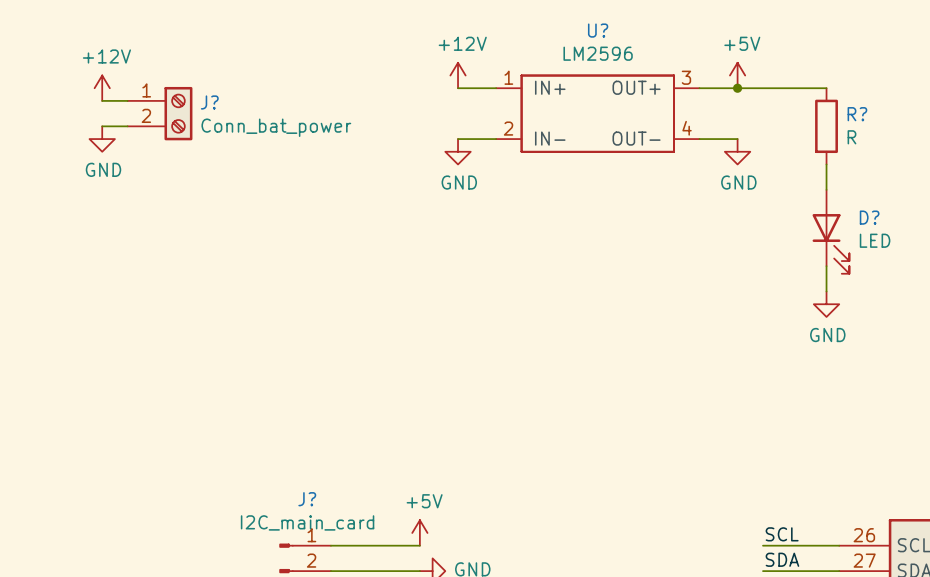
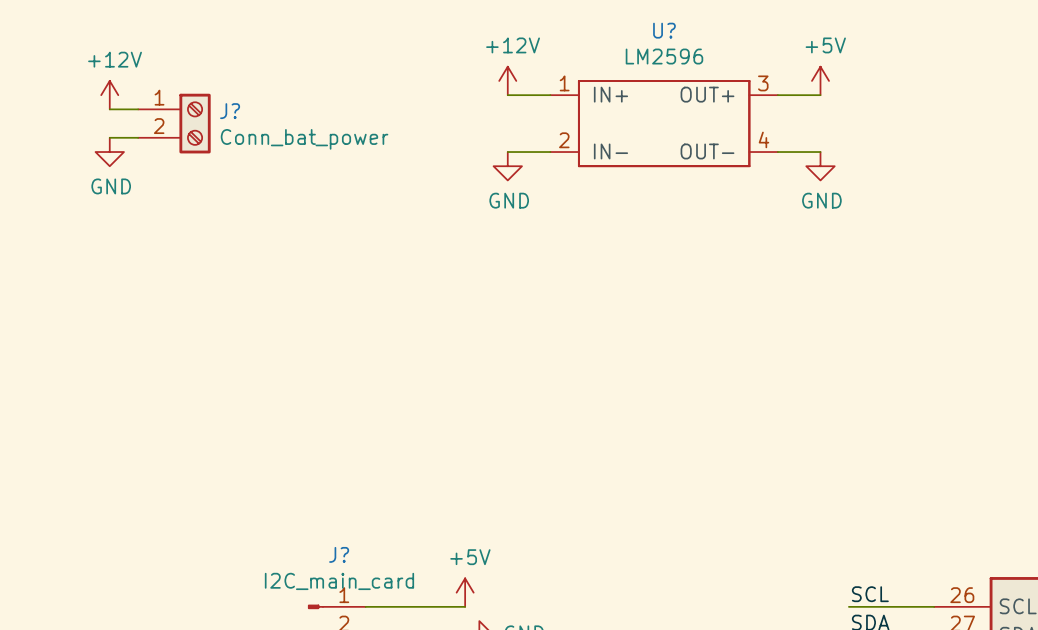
wire: (737, 88) (826, 88) -> none
junction: (737, 88) -> none
R?: R (826, 126) -> none
wire: (826, 164) (826, 189) -> none
D?: LED (830, 231) -> none
wire: (826, 266) (826, 291) -> none
power symbol: GND (826, 304) -> none

